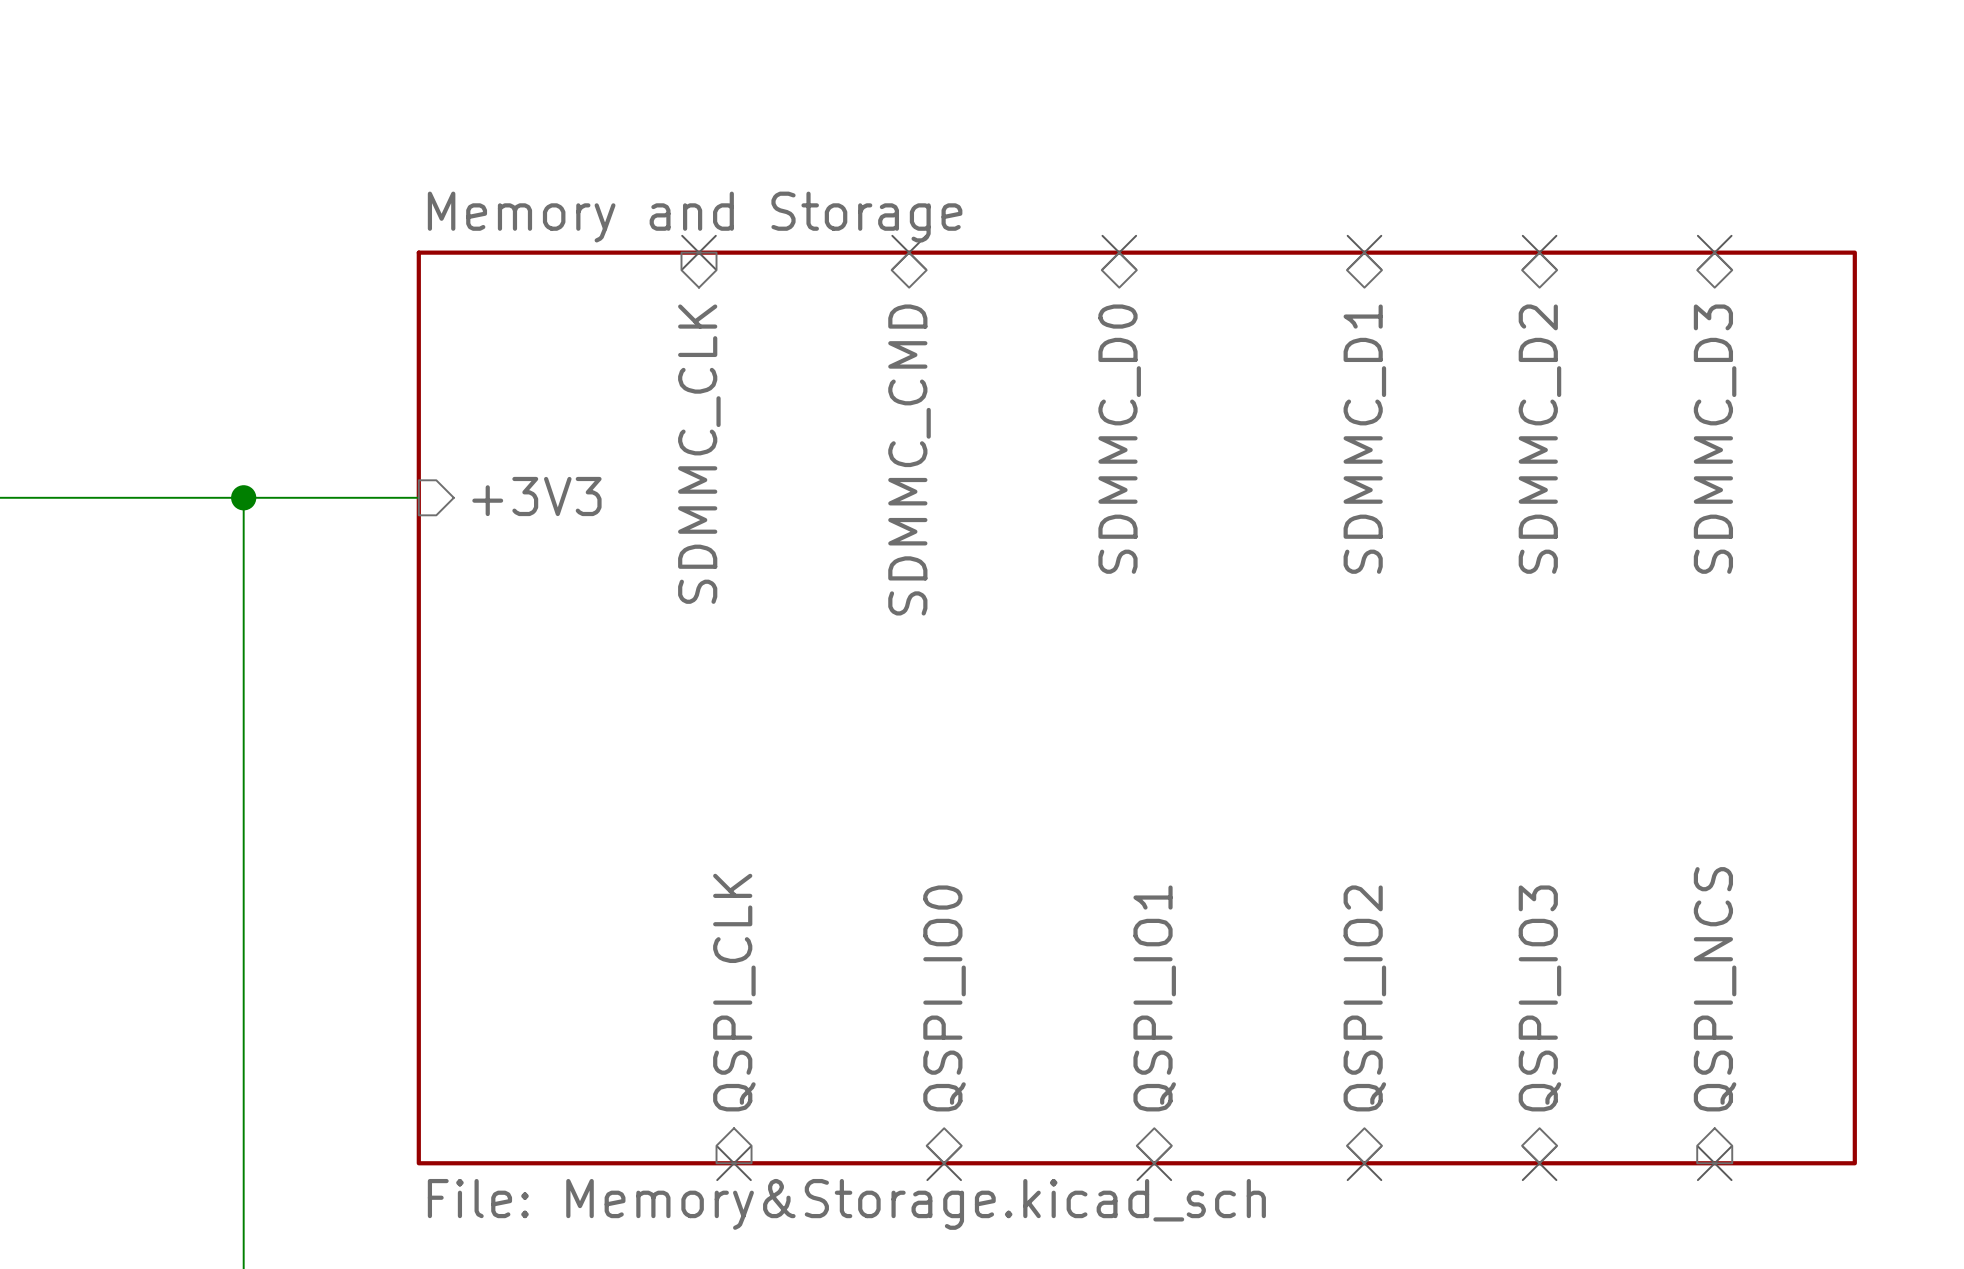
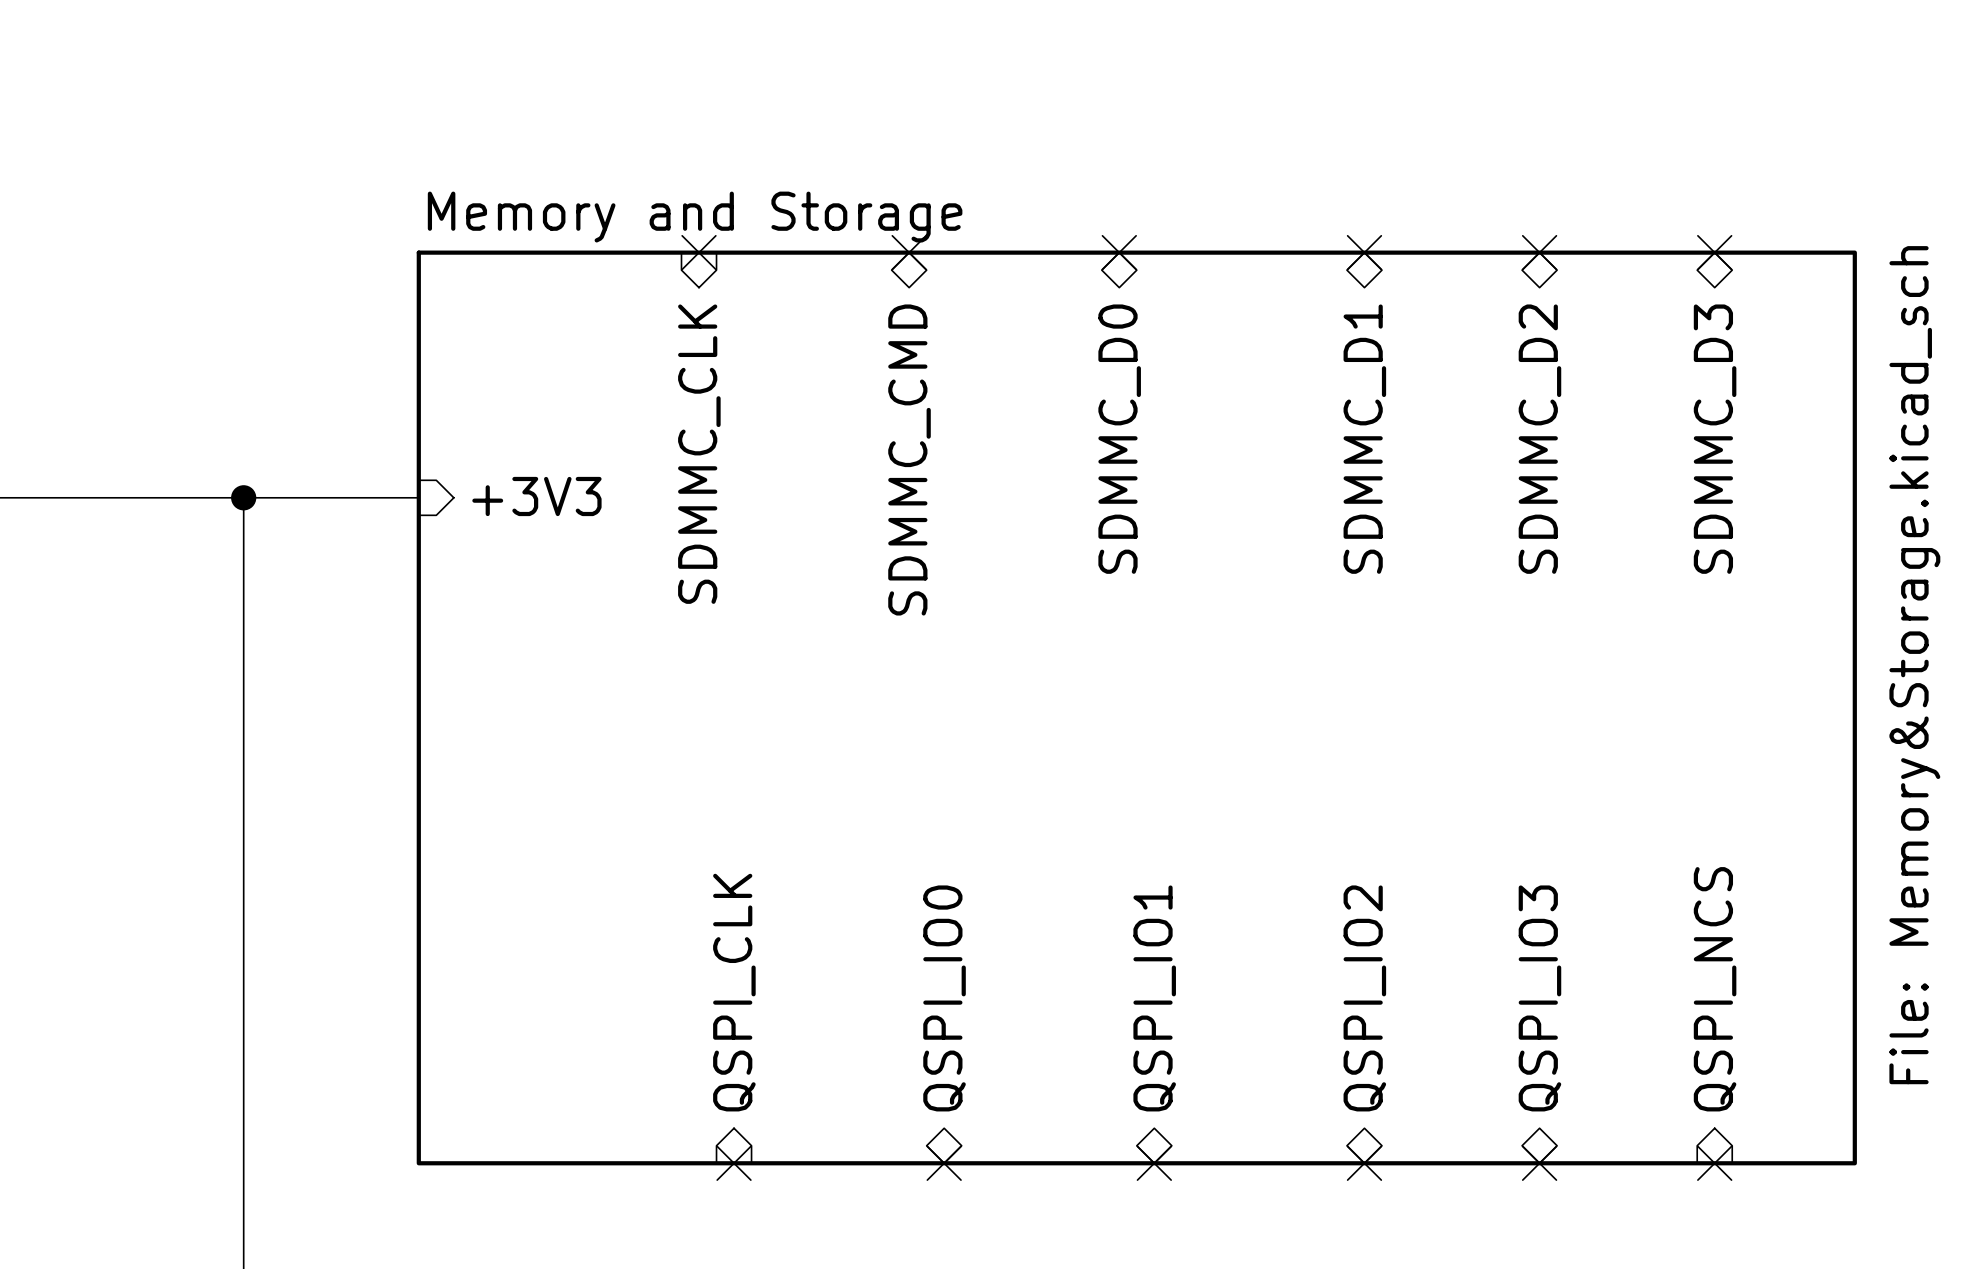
sheet Memory and Storage value rotation: 0° (846, 1204) -> 90° counterclockwise (1914, 665)
sheet Memory and Storage value position: File: Memory&Storage.kicad_sch (846, 1204) -> File: Memory&Storage.kicad_sch (1914, 665)

